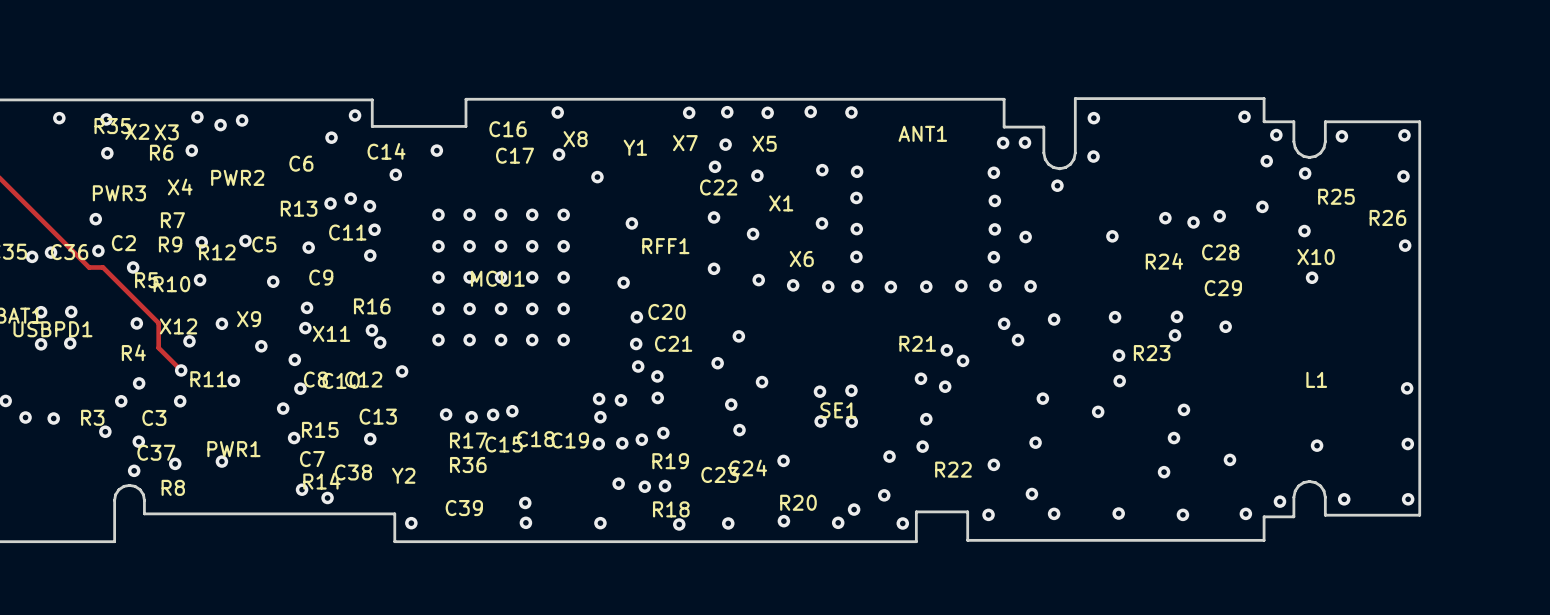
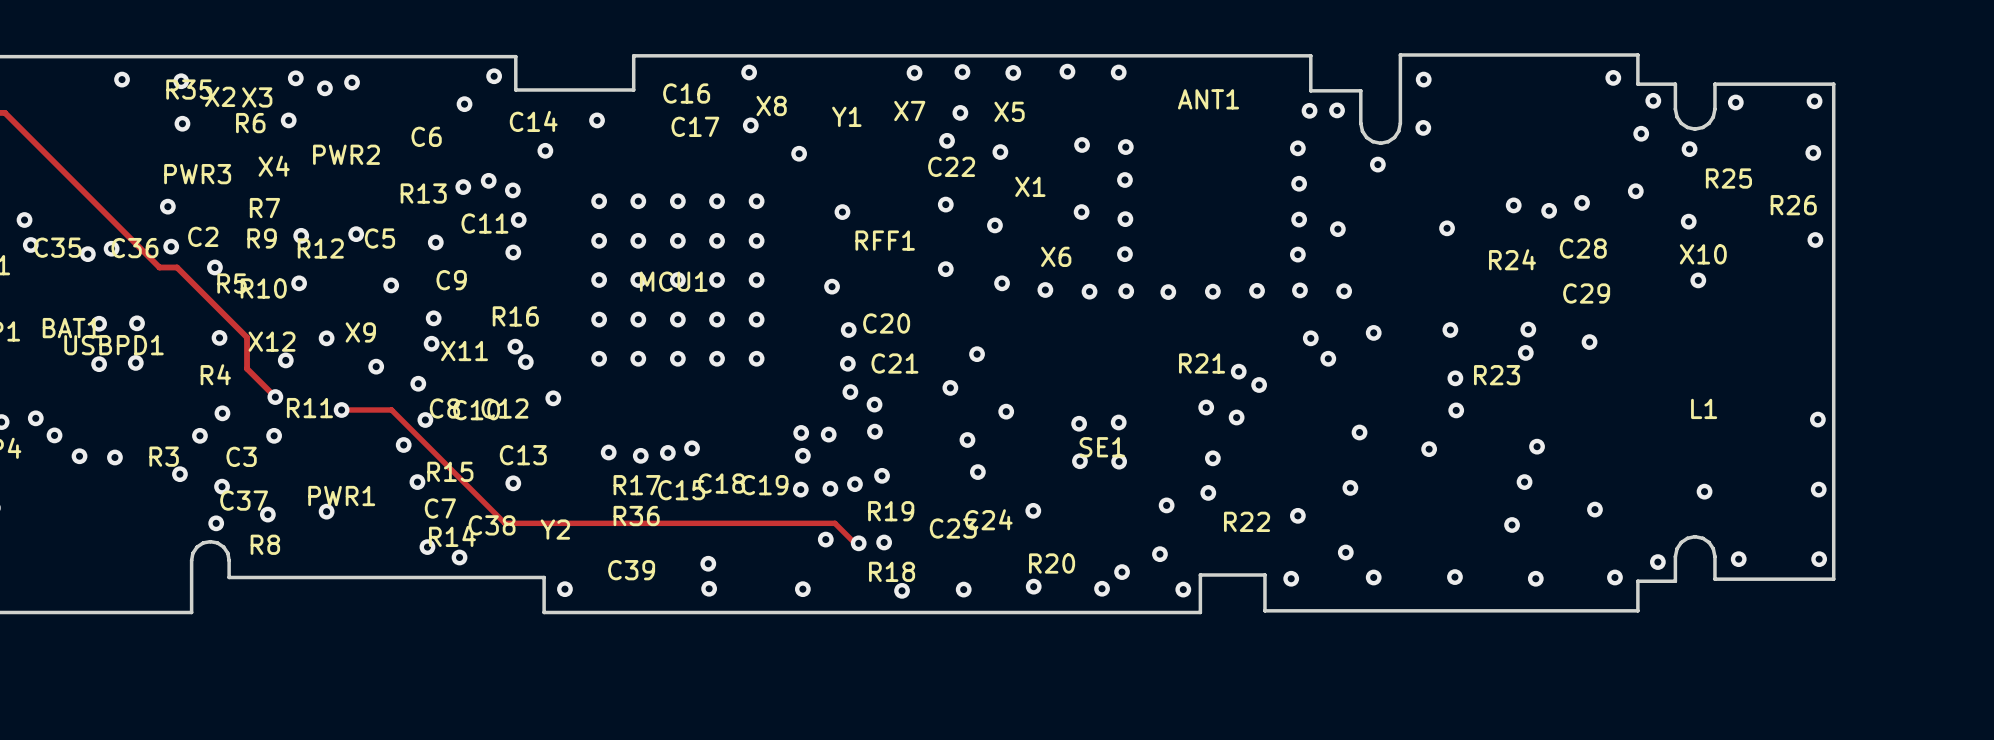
track: none -> (341, 409) (391, 409) (504, 523) (834, 523) (854, 543) (858, 543)

